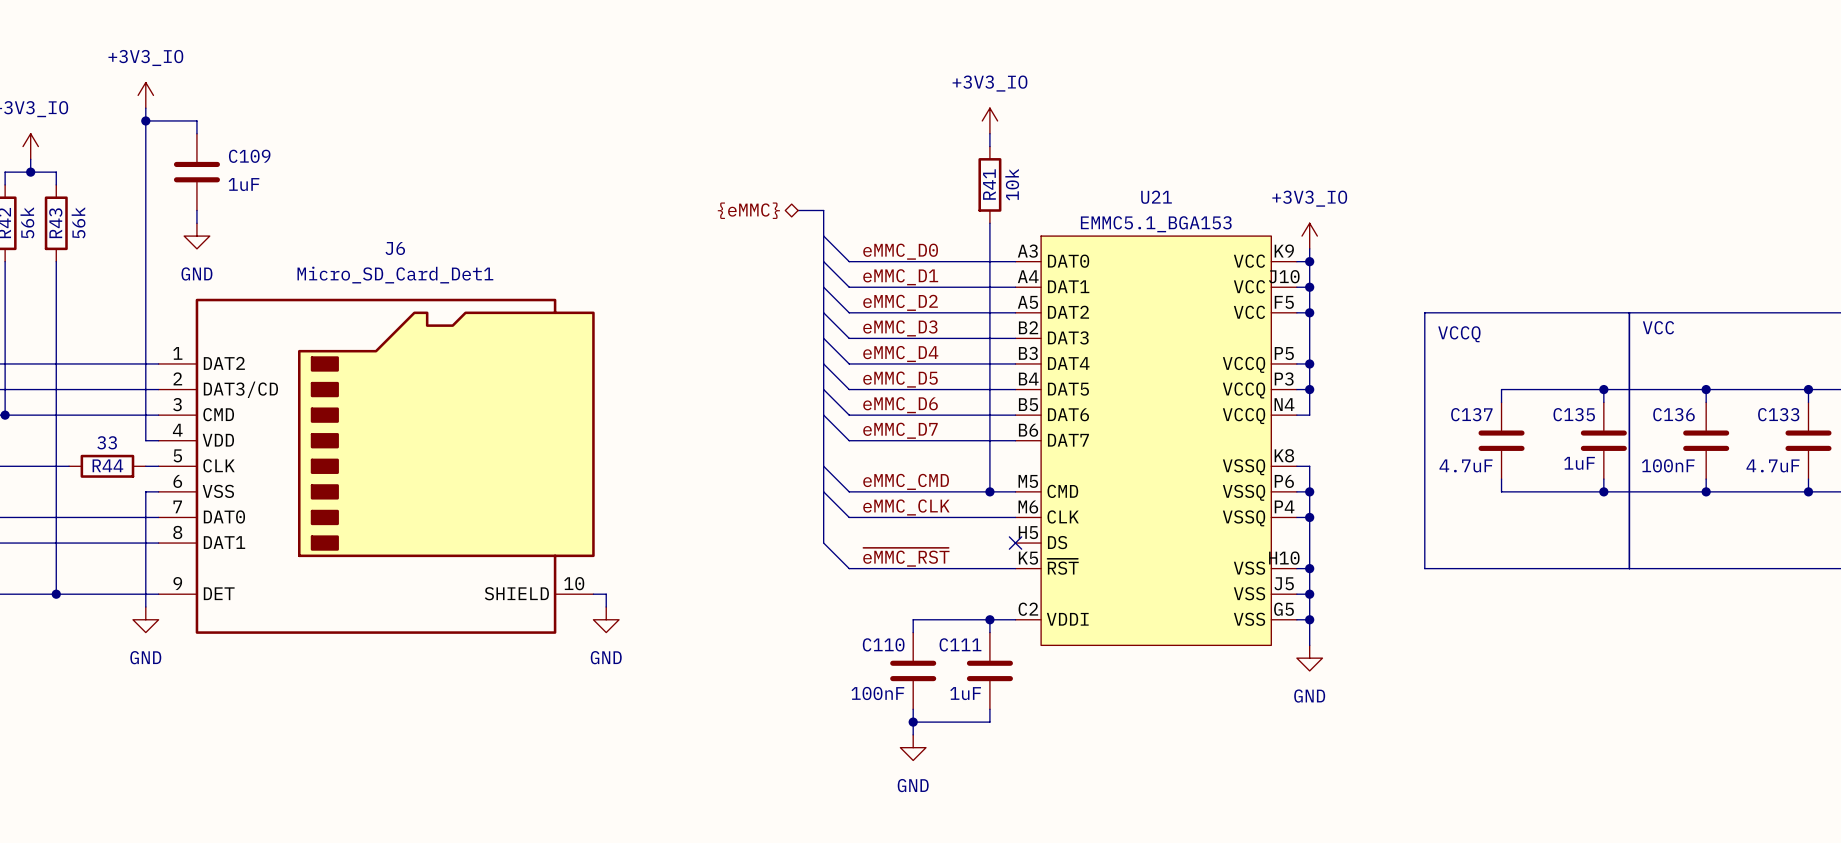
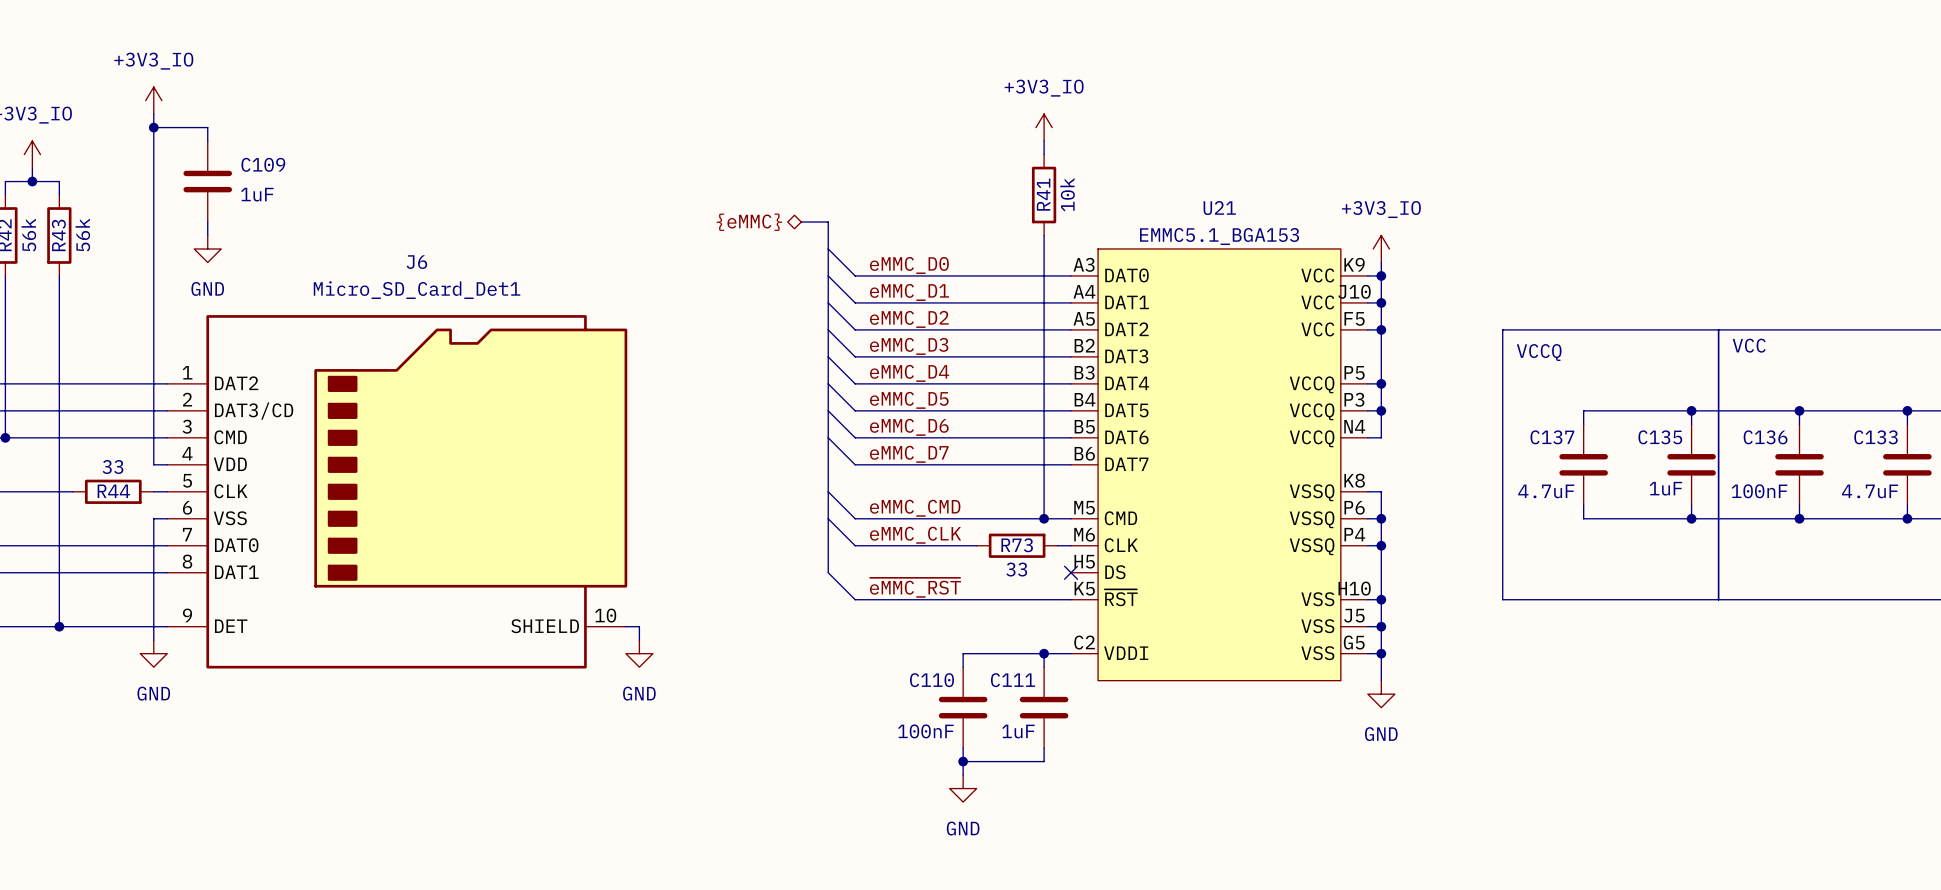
hierarchical label position: {eMMC} (748, 210) -> {eMMC} (749, 222)
bus: (798, 210) (823, 210) (823, 543) -> (801, 222) (828, 222) (828, 572)
wire: (823, 236) (849, 261) -> (828, 248) (855, 275) (895, 275)
label position: eMMC_D0 (900, 251) -> eMMC_D0 (909, 265)
wire: (823, 261) (849, 287) -> (828, 275) (855, 302) (895, 302)
label position: eMMC_D1 (900, 277) -> eMMC_D1 (909, 292)
wire: (823, 287) (849, 312) -> (828, 302) (855, 329) (895, 329)
label position: eMMC_D2 (900, 302) -> eMMC_D2 (909, 319)
wire: (823, 312) (849, 338) -> (828, 329) (855, 356) (895, 356)
label position: eMMC_D3 (900, 328) -> eMMC_D3 (909, 346)
wire: (823, 338) (849, 363) -> (828, 356) (855, 383) (895, 383)
label position: eMMC_D4 (900, 354) -> eMMC_D4 (909, 373)
wire: (823, 363) (849, 389) -> (828, 383) (855, 410) (895, 410)
label position: eMMC_D5 (900, 379) -> eMMC_D5 (909, 400)
wire: (823, 389) (849, 415) -> (828, 410) (855, 437) (895, 437)
label position: eMMC_D6 (900, 405) -> eMMC_D6 (909, 427)
wire: (823, 415) (849, 440) -> (828, 437) (855, 464) (895, 464)
label position: eMMC_D7 (900, 430) -> eMMC_D7 (909, 454)
wire: (823, 466) (849, 491) -> (828, 491) (855, 518) (895, 518)
label position: eMMC_CMD (906, 481) -> eMMC_CMD (915, 508)
wire: (823, 491) (849, 517) -> (828, 518) (855, 545) (895, 545)
label position: eMMC_CLK (906, 507) -> eMMC_CLK (915, 535)
wire: (925, 517) (1002, 517) -> none
R73: none -> 33 (1017, 545)
wire: (823, 543) (849, 568) -> (828, 572) (855, 599) (895, 599)
label position: ~{eMMC_RST} (906, 557) -> ~{eMMC_RST} (915, 587)

